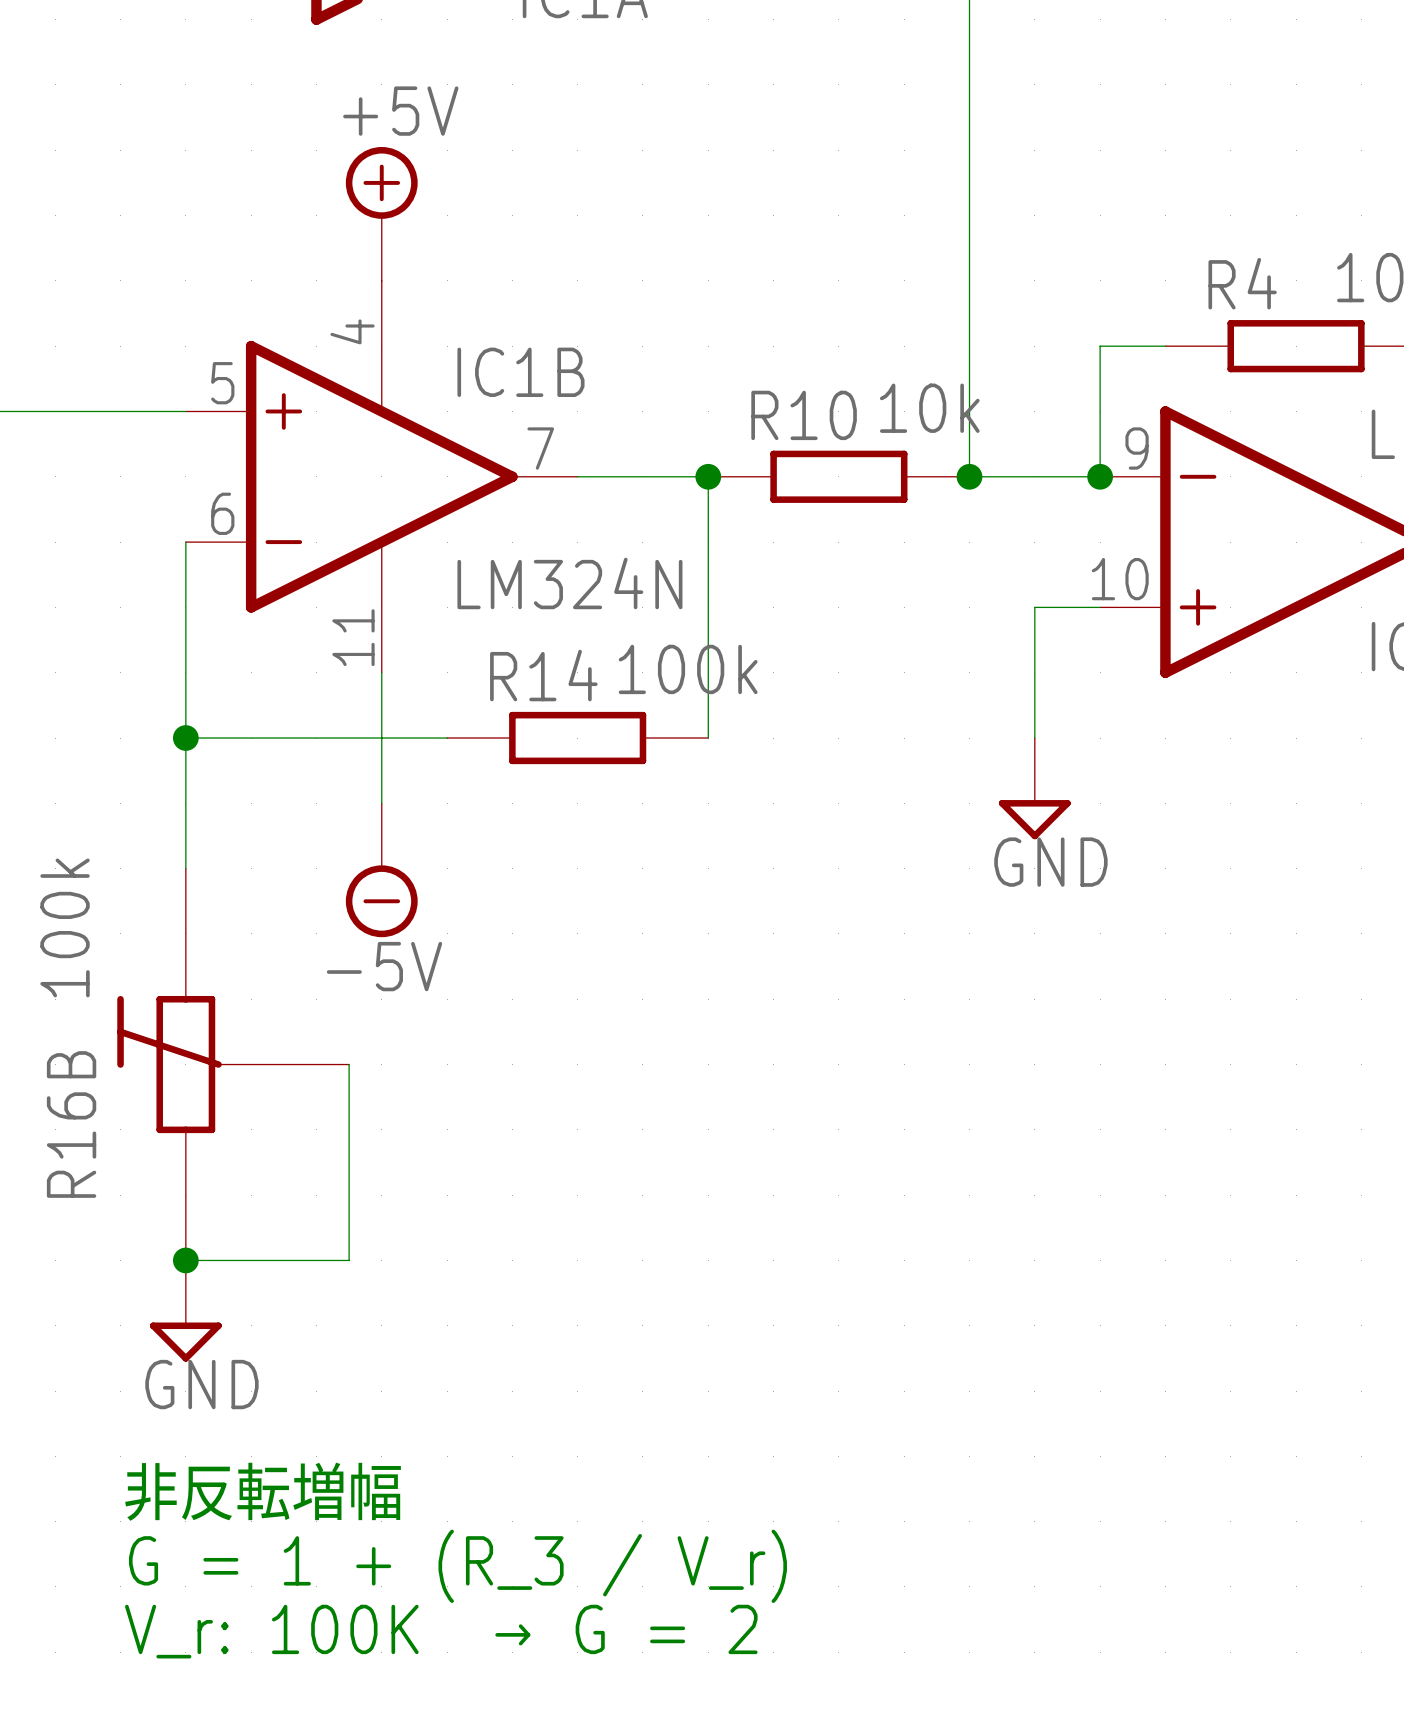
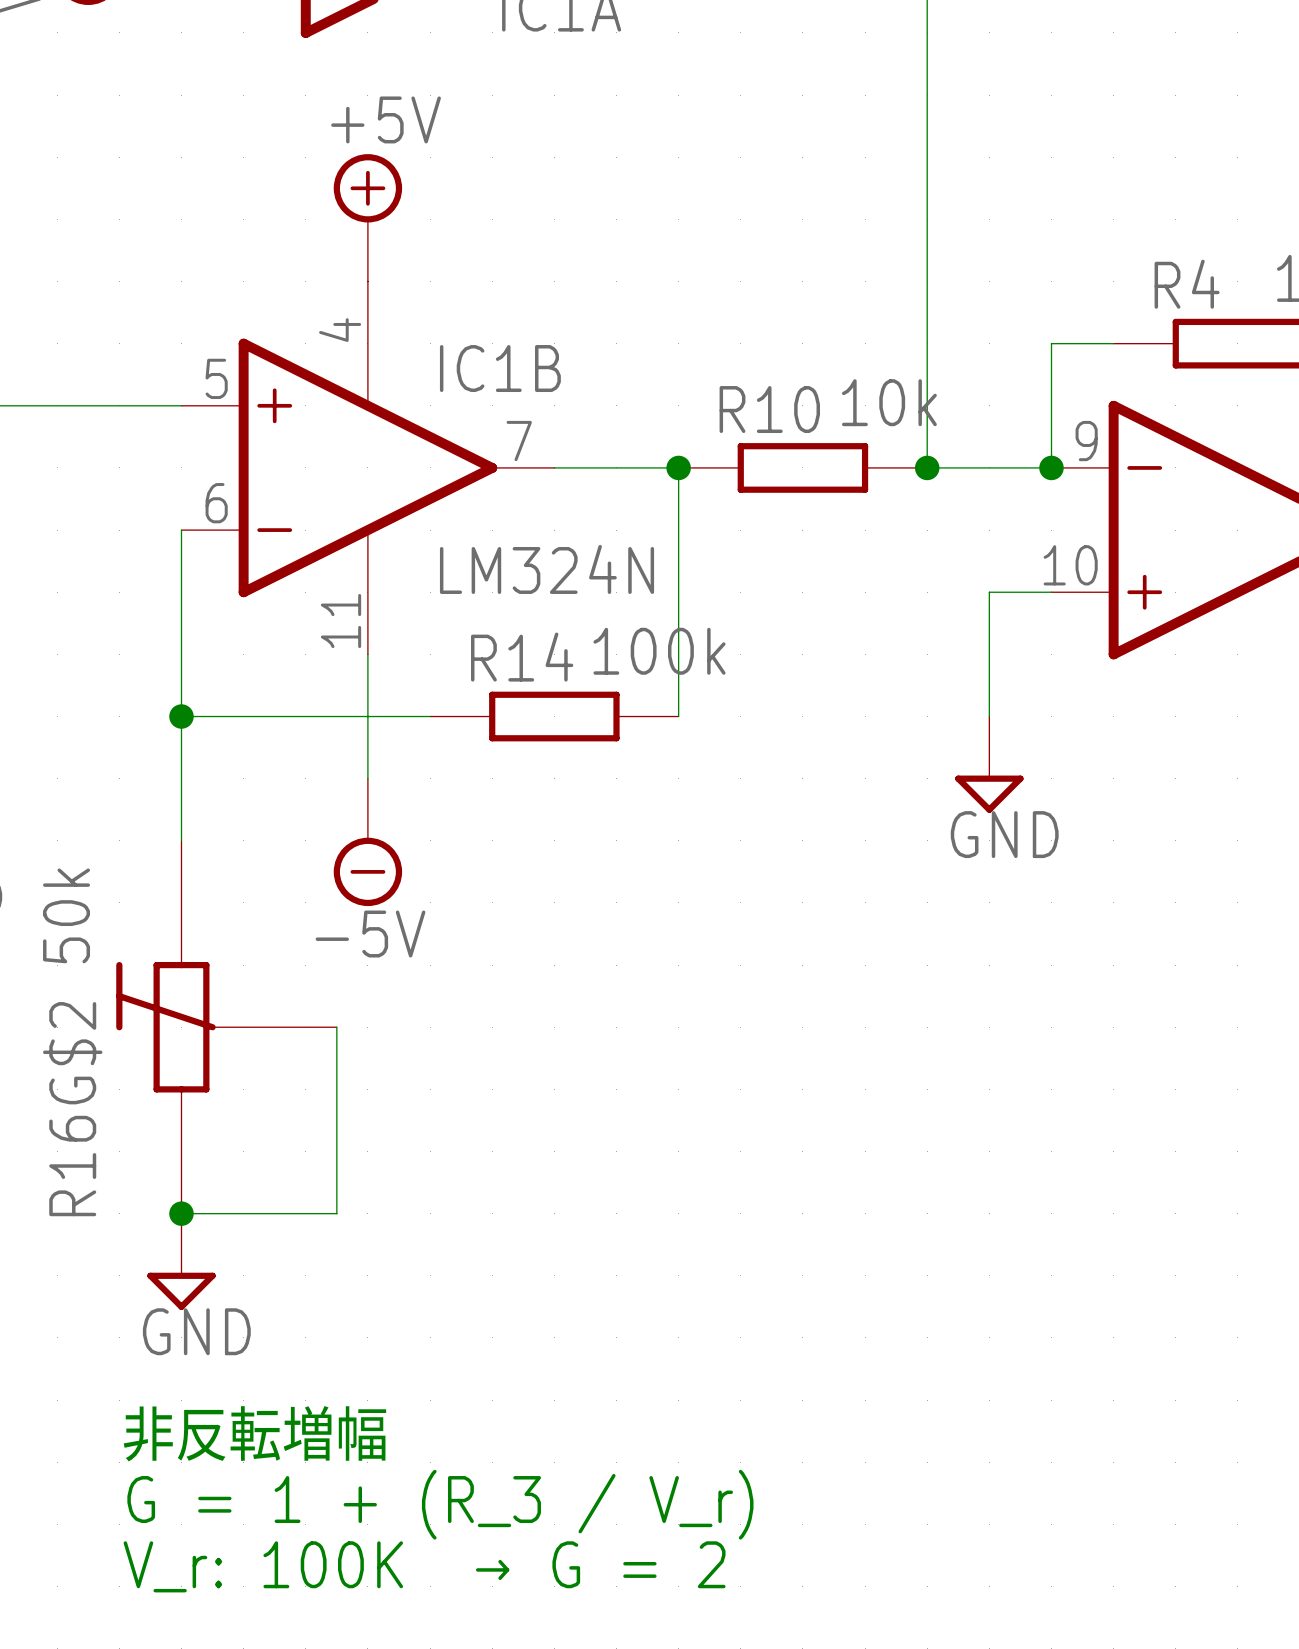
R16B value: 100k (65, 927) -> 50k (66, 915)
R16B name: R16B (71, 1124) -> R16G$2 (72, 1109)

